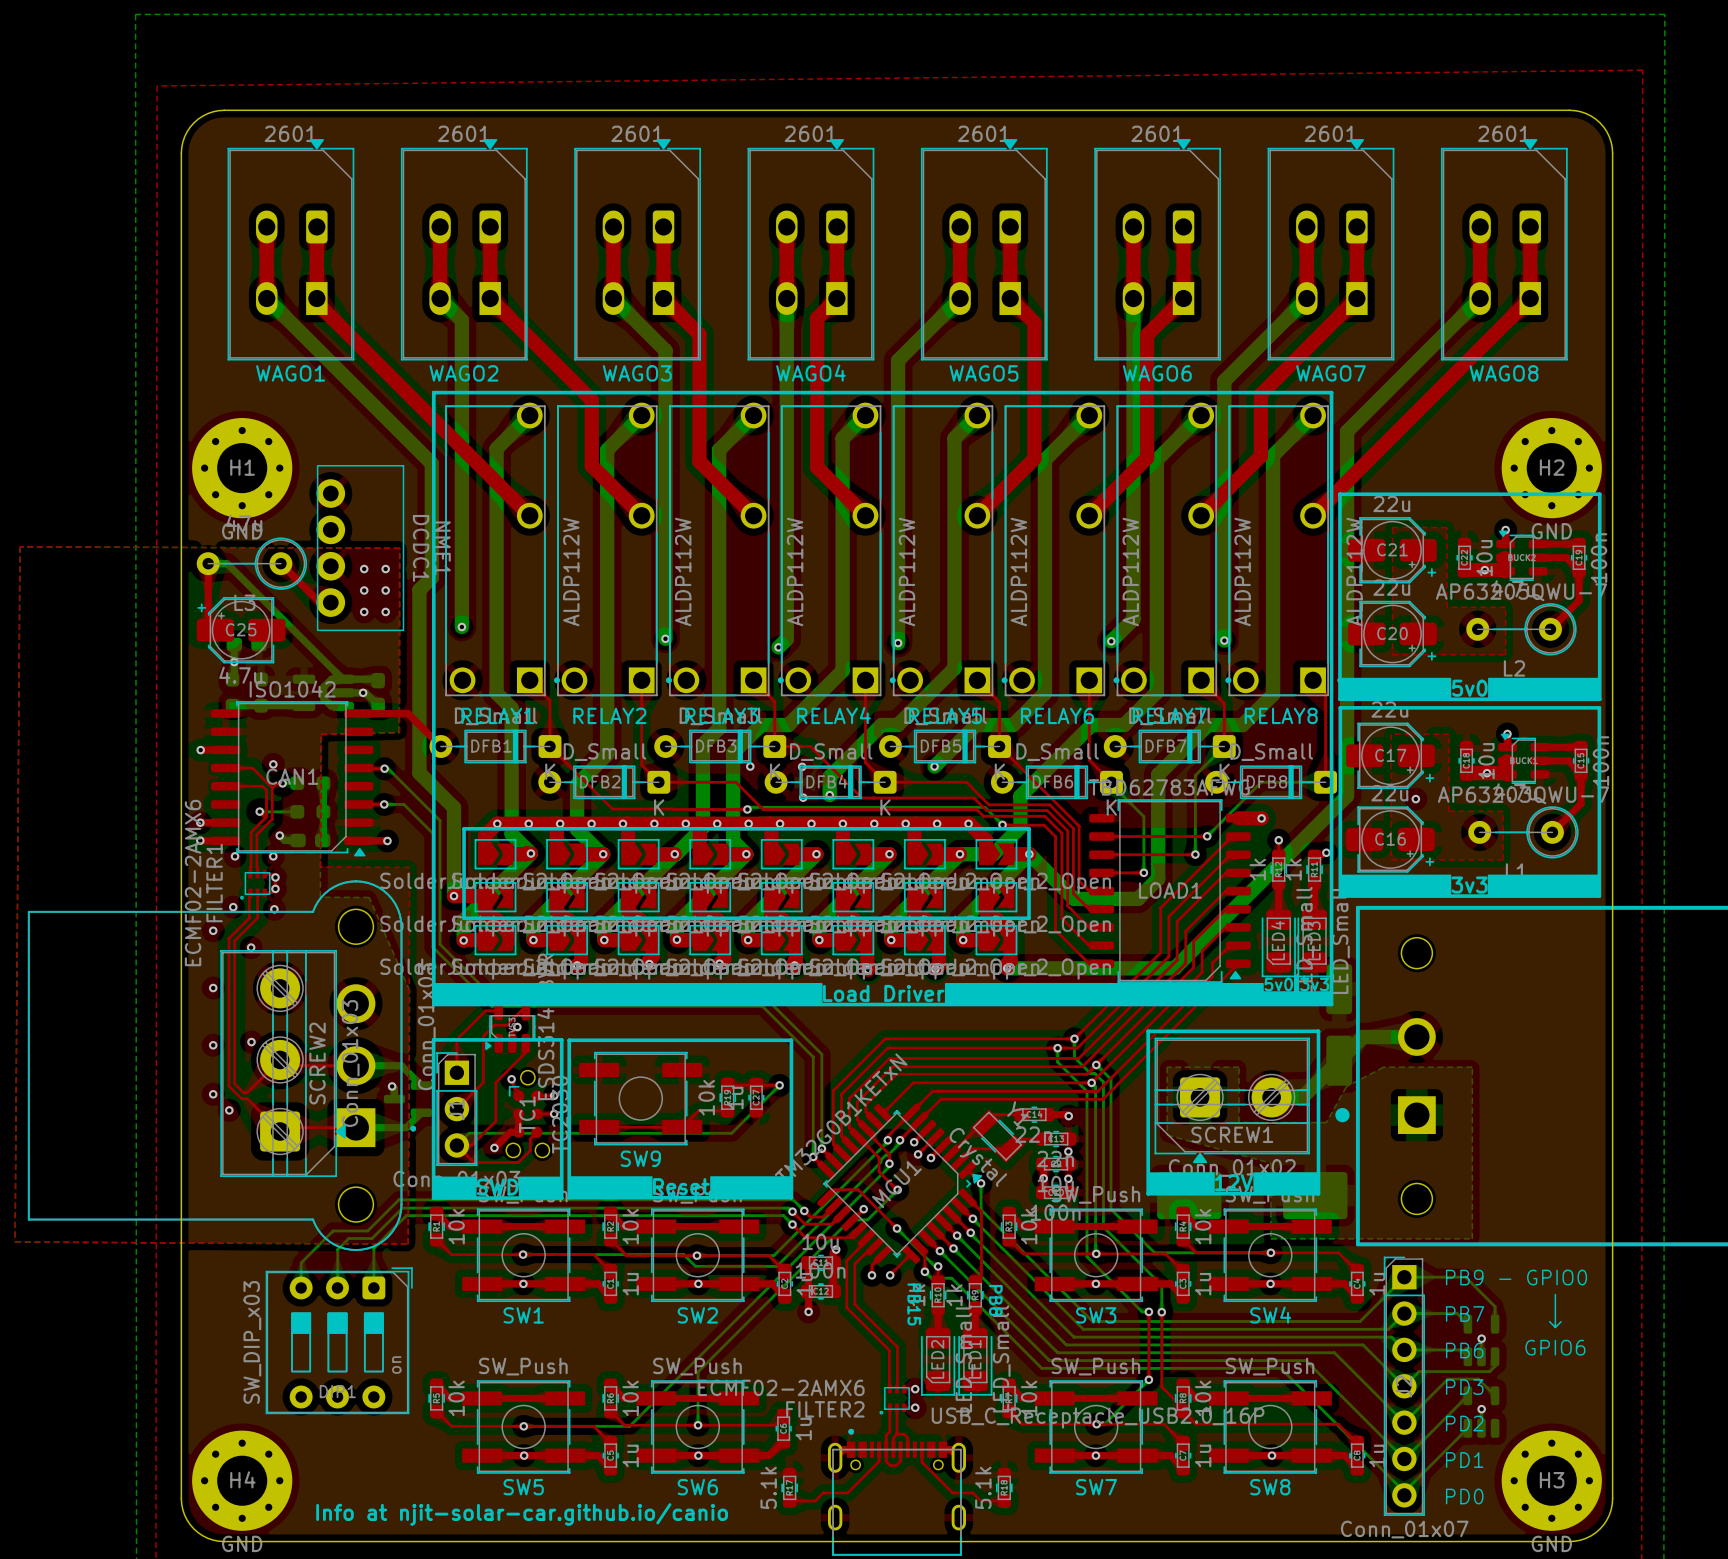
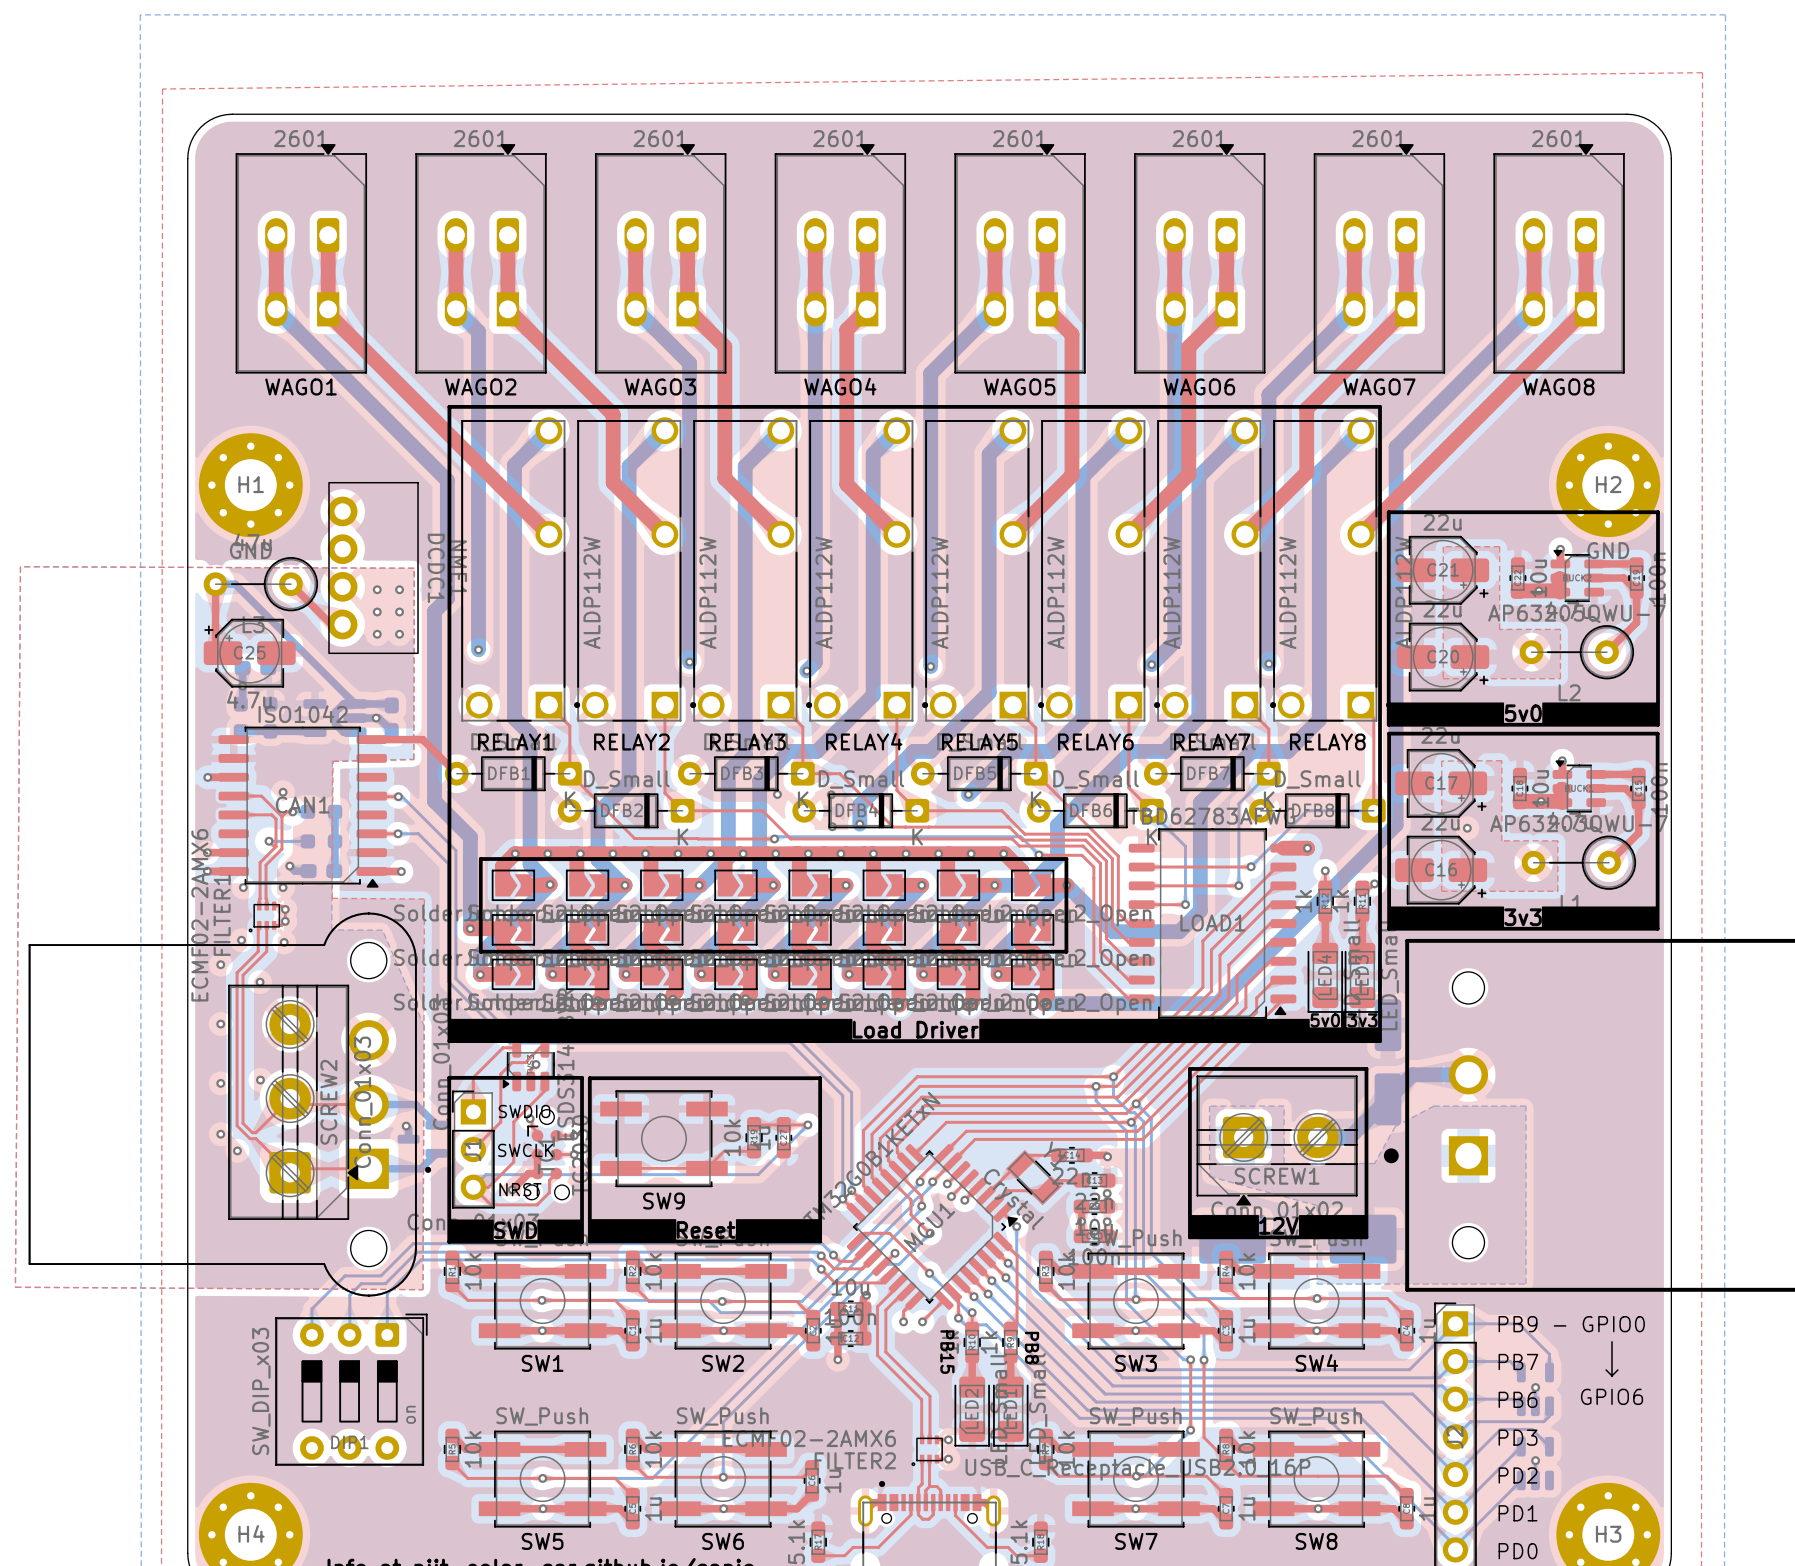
text: none -> SWDIO (524, 1111)
text: none -> SWCLK (525, 1150)
text: none -> NRST (520, 1189)

